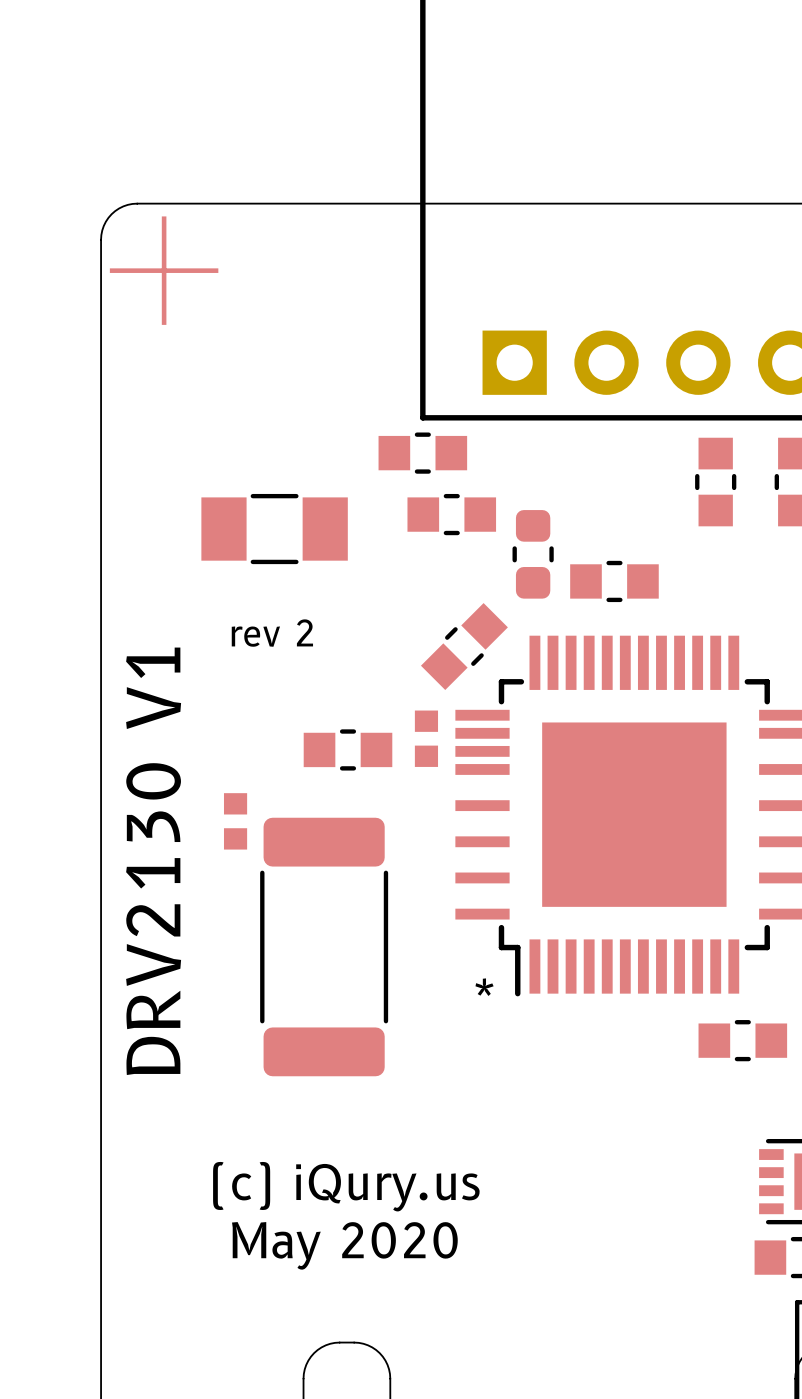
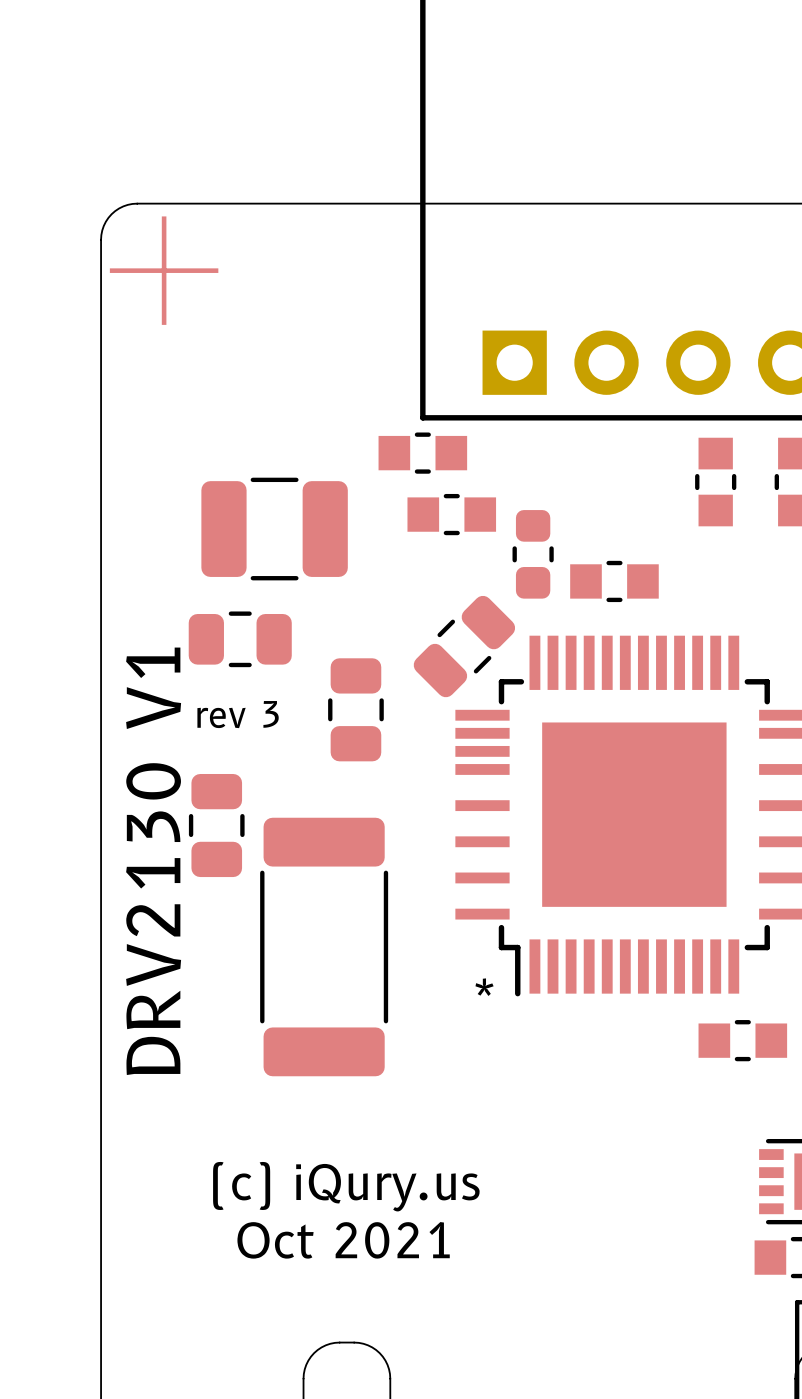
part footprint: [201, 493, 348, 565] -> [201, 477, 348, 581]
part footprint: [420, 603, 508, 691] -> [413, 595, 516, 698]
text: rev 2 (272, 633) -> none
part: none -> (240, 639)
part: none -> (355, 709)
text: none -> rev 3 (238, 714)
part: (426, 738) -> none
part: (347, 749) -> none
part footprint: [223, 793, 248, 850] -> [188, 773, 245, 878]
text: May 2020 (344, 1245) -> Oct 2021 (343, 1240)

